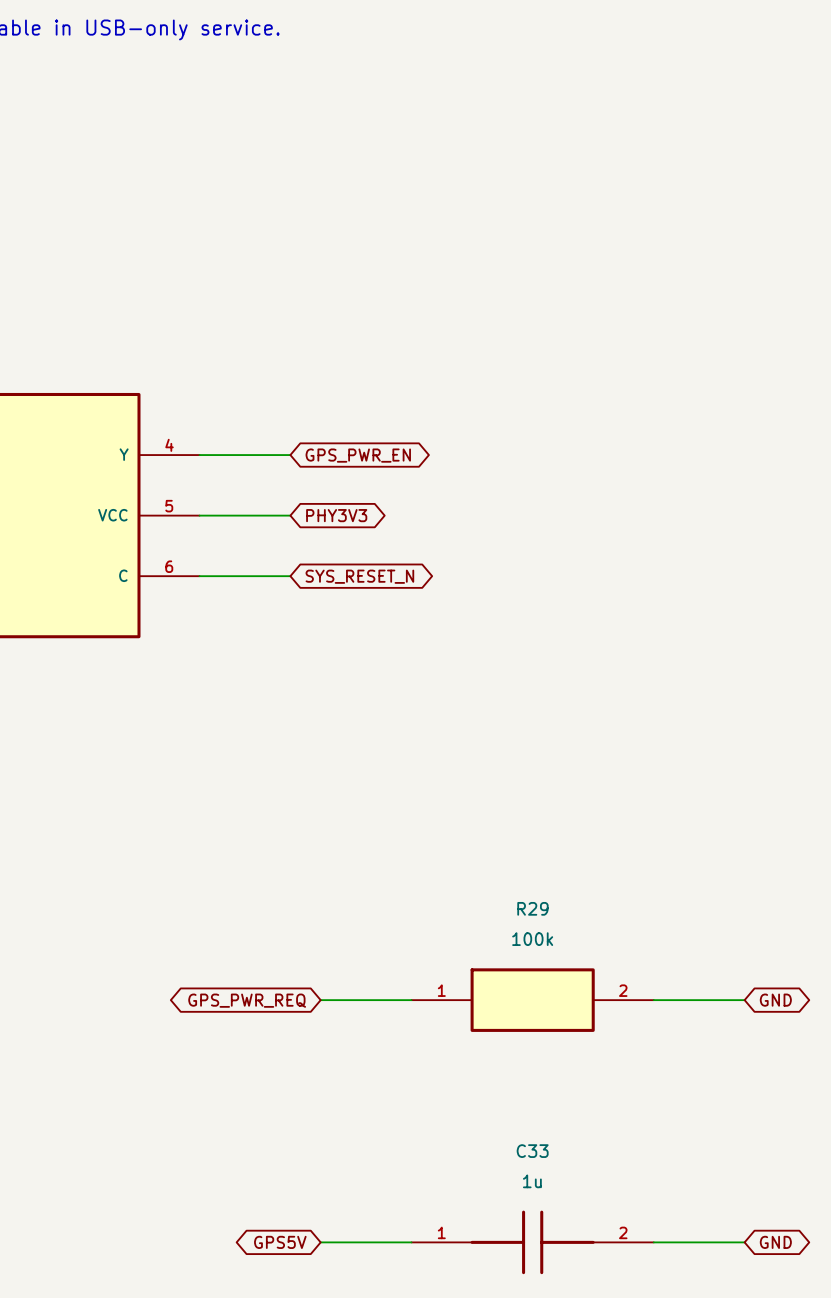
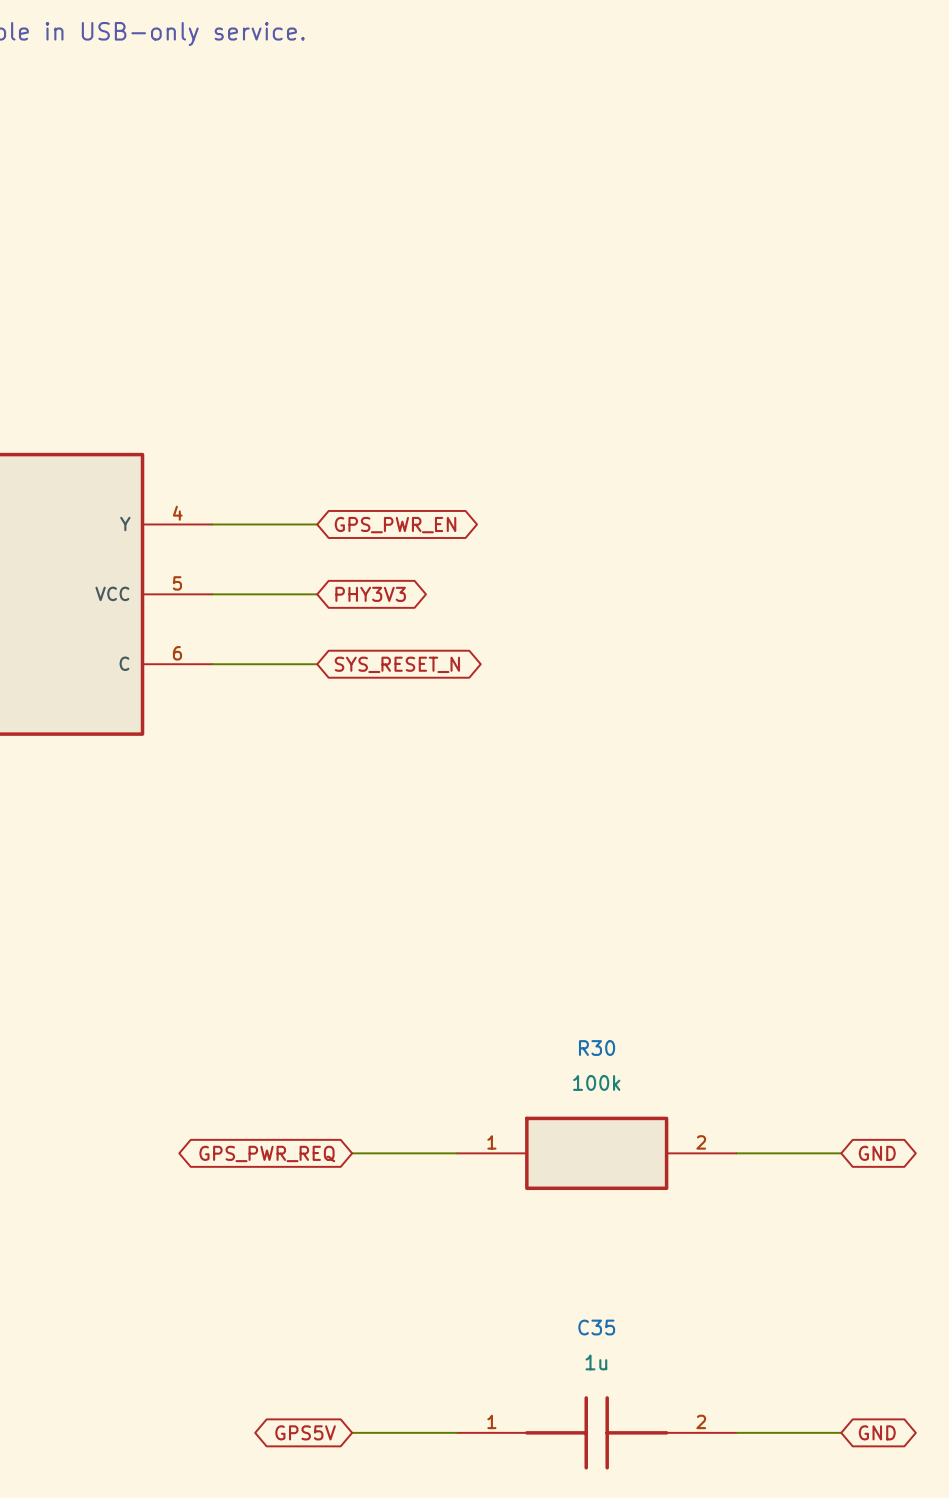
R29 name: R29 (532, 908) -> R30 (597, 1048)
C33 name: C33 (532, 1151) -> C35 (596, 1327)

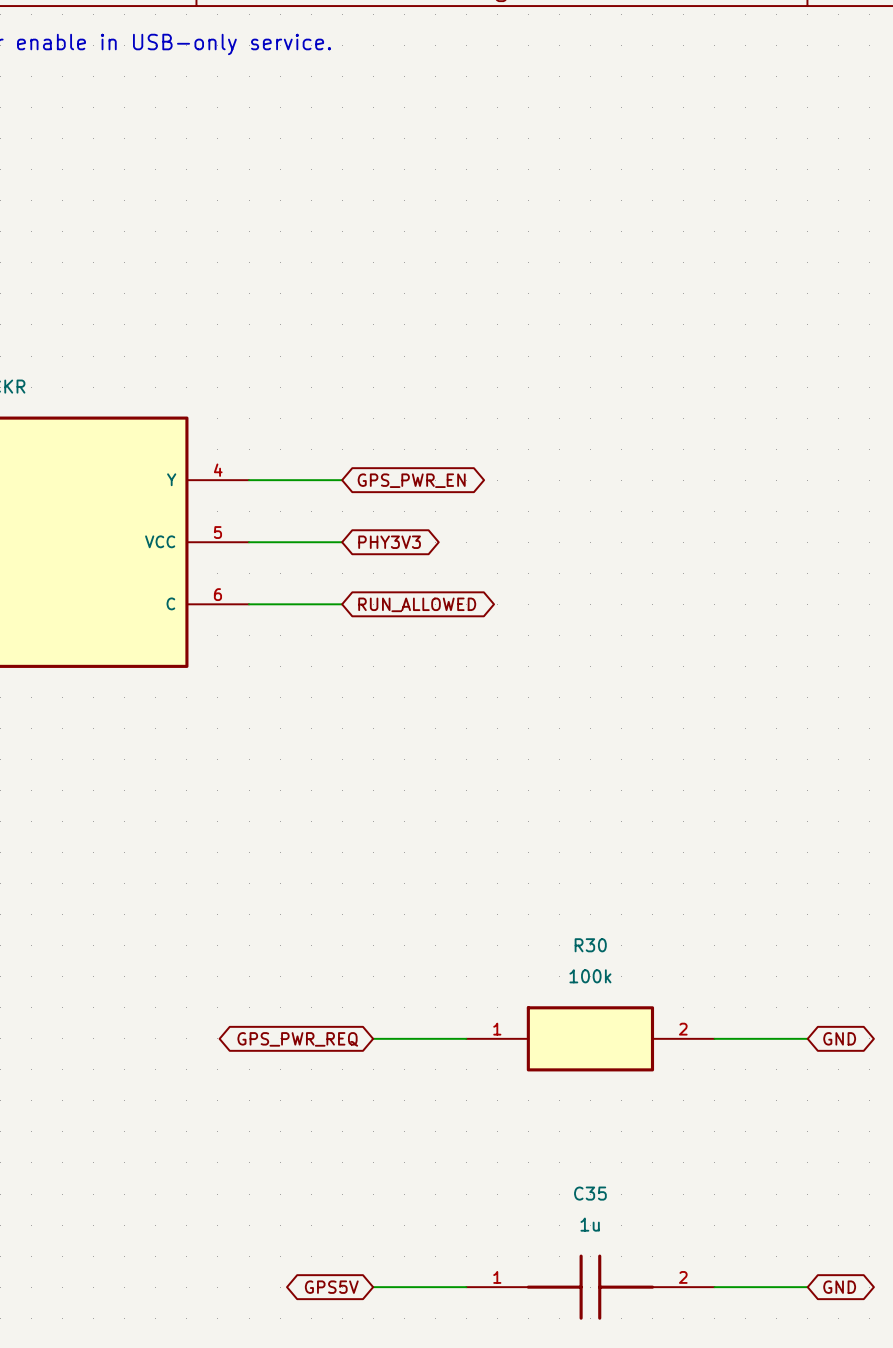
global label: SYS_RESET_N (397, 664) -> RUN_ALLOWED (417, 604)

